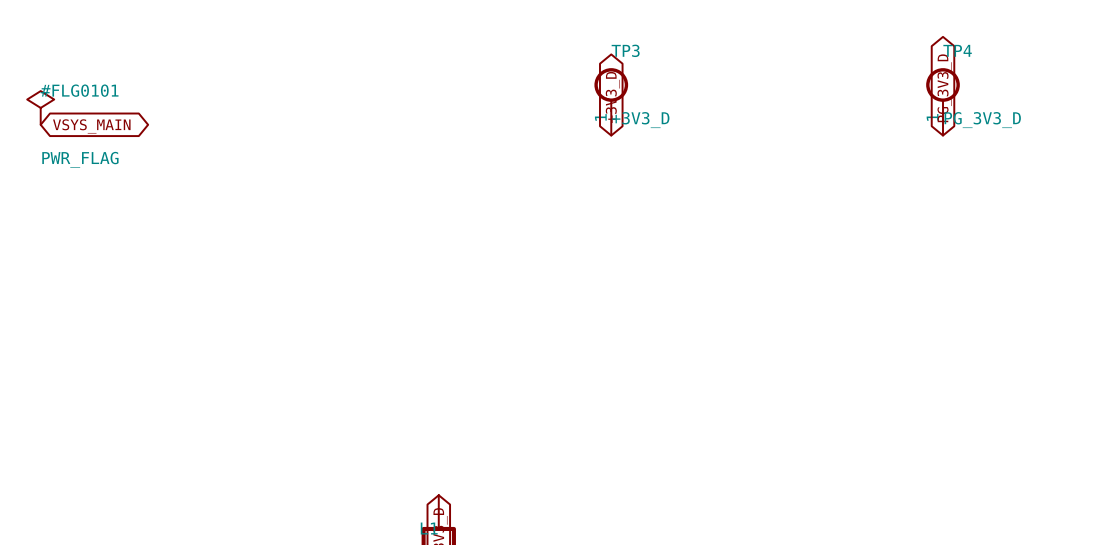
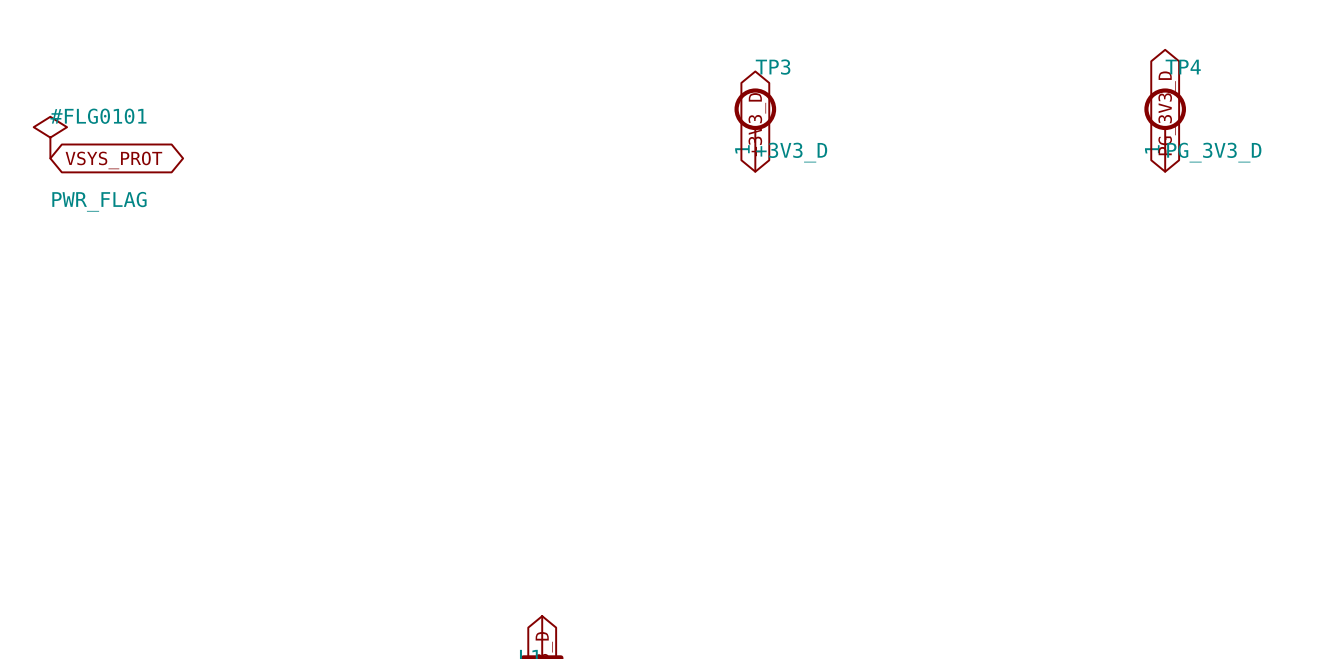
global label: VSYS_MAIN (91, 126) -> VSYS_PROT (113, 160)

